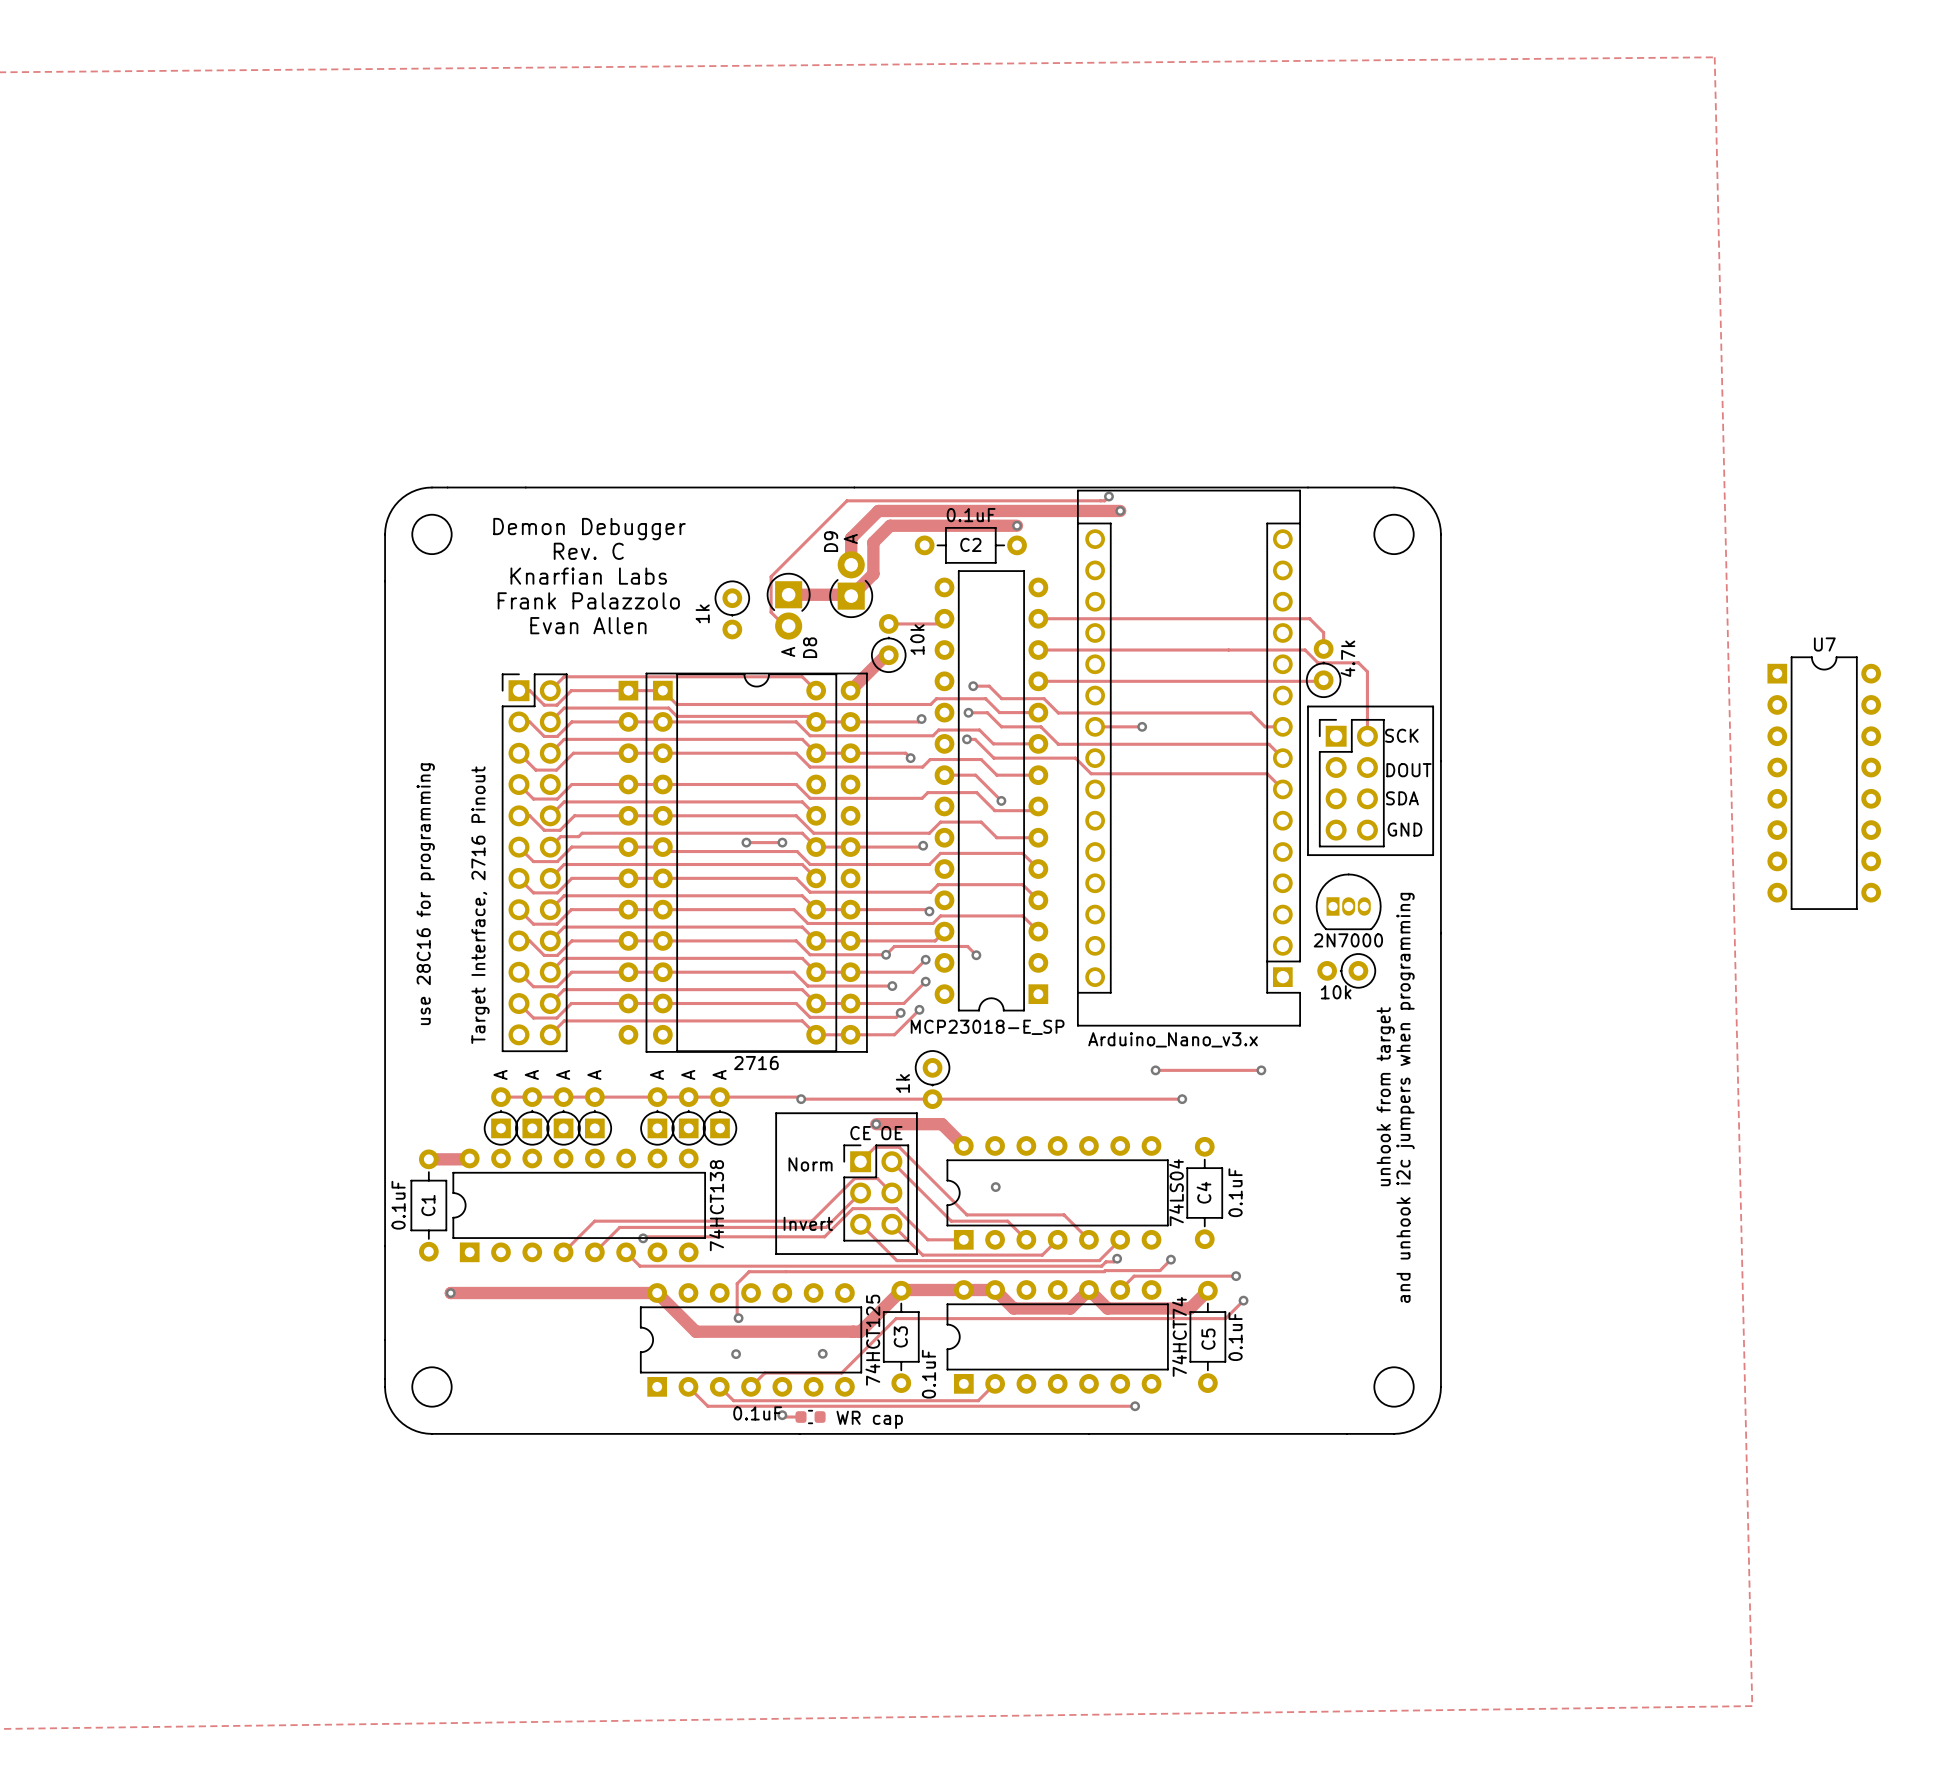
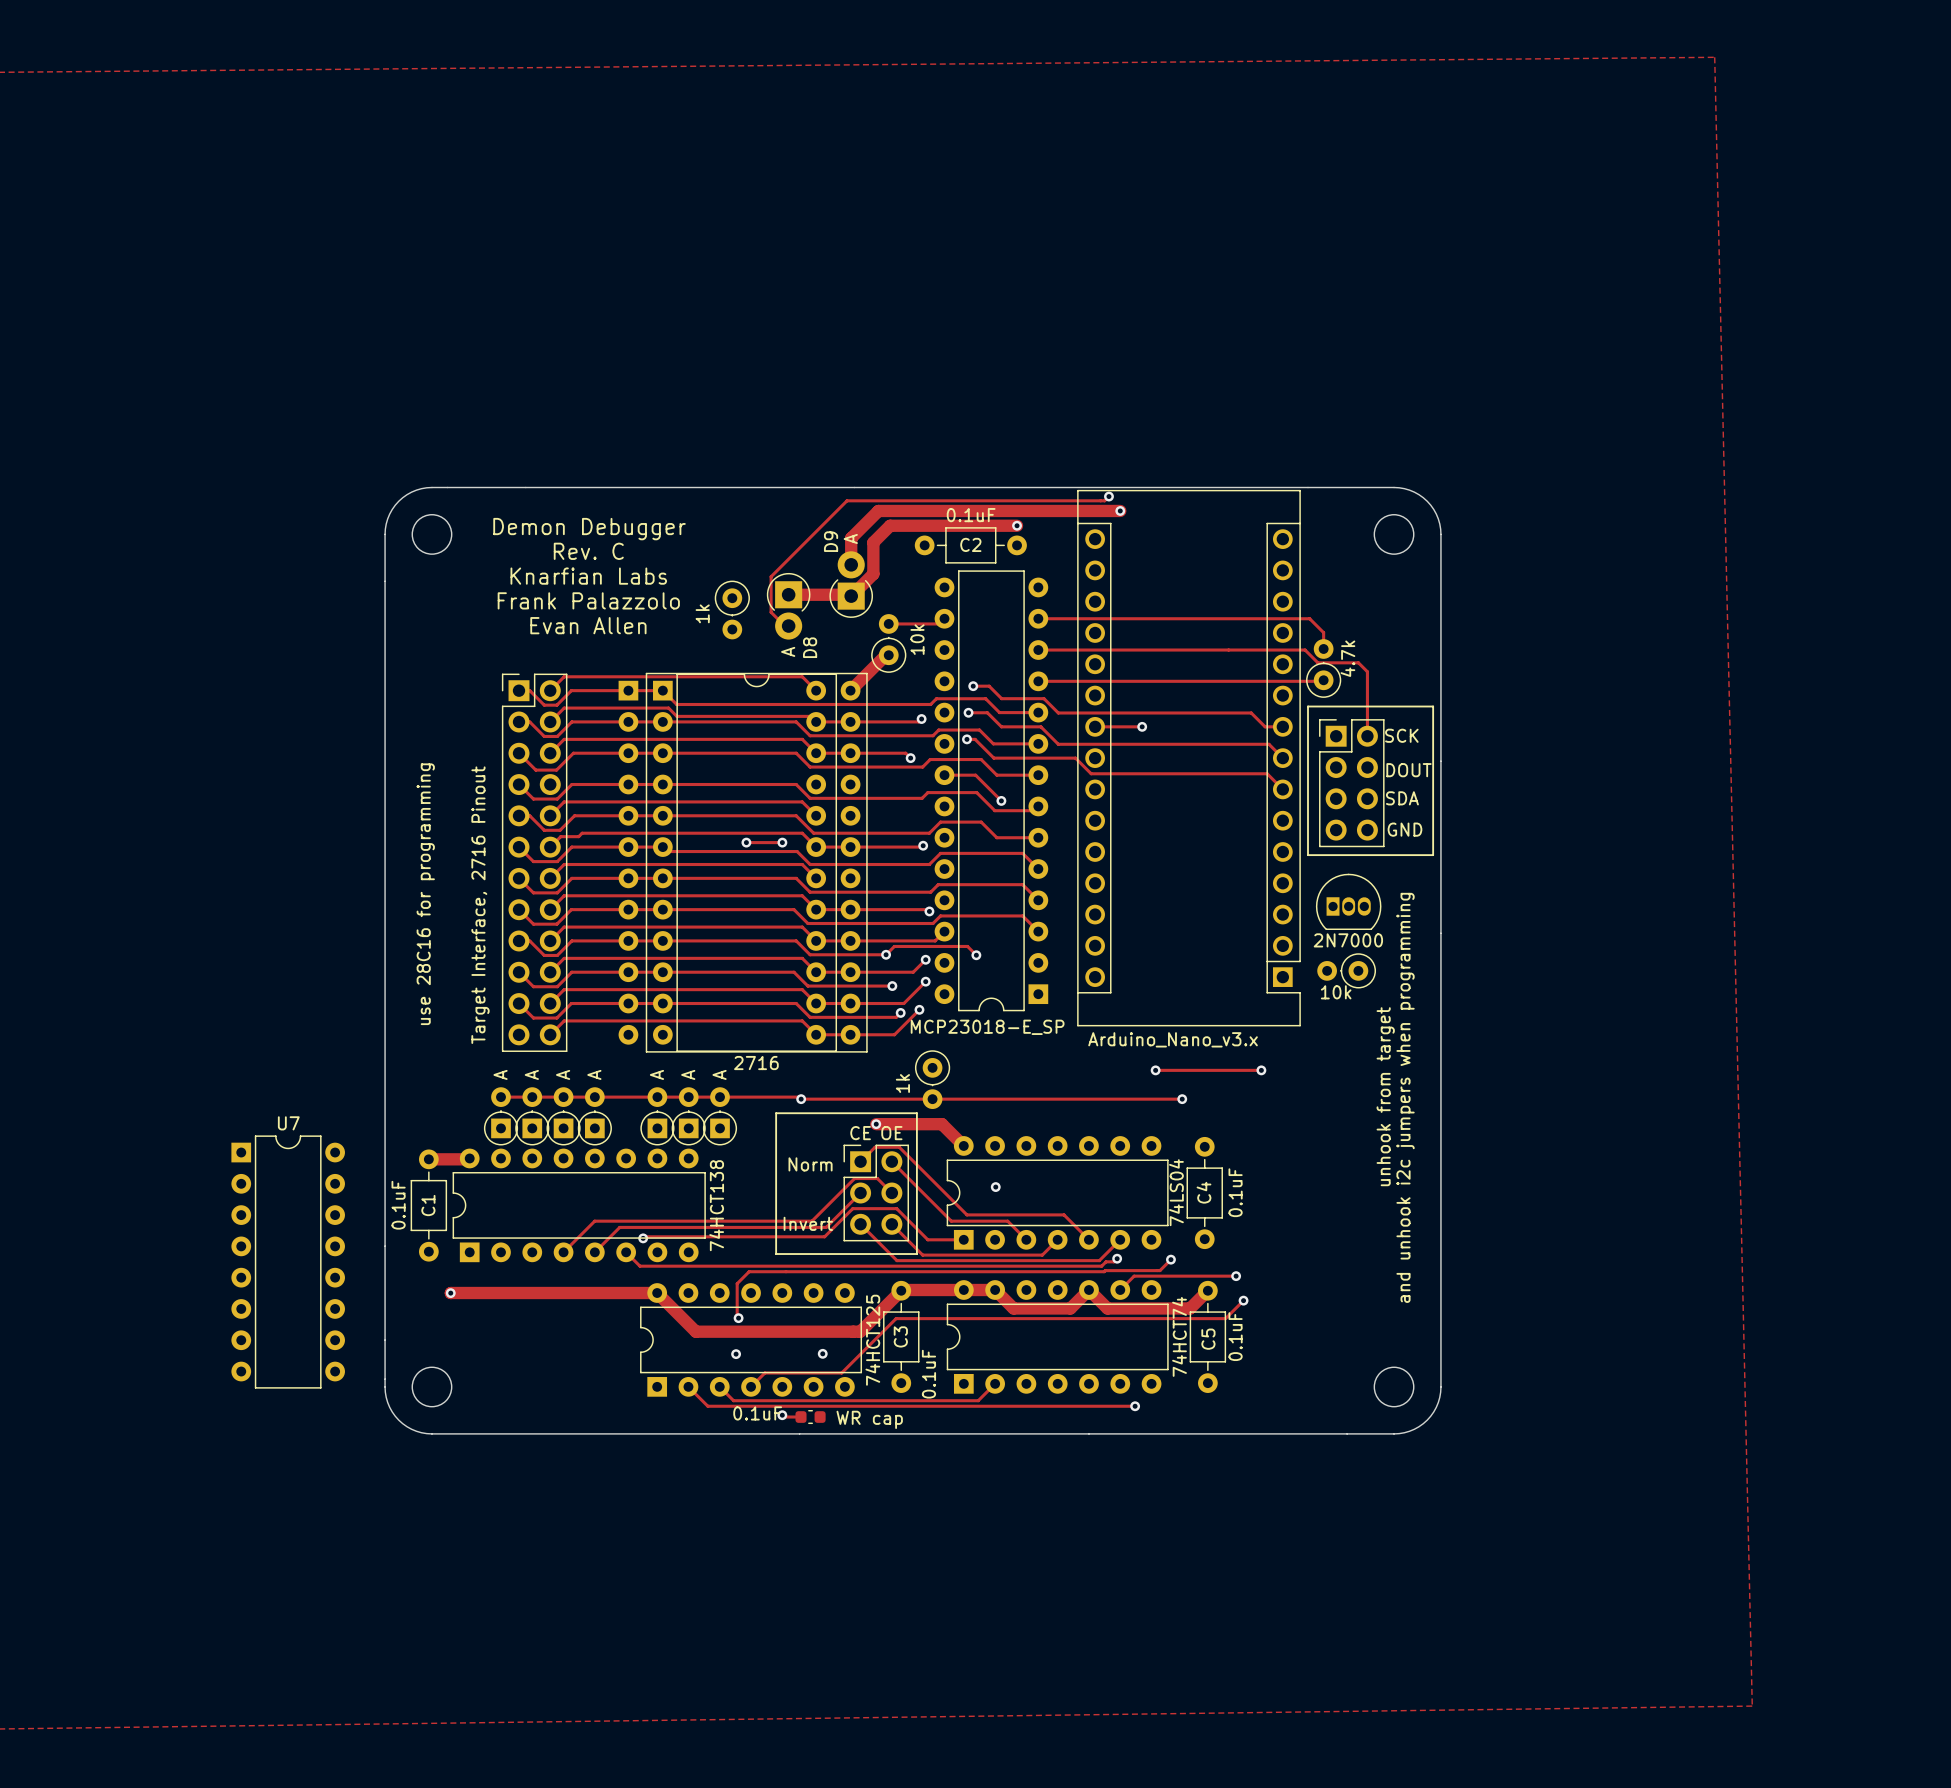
U7 position: (1824, 783) -> (288, 1262)

